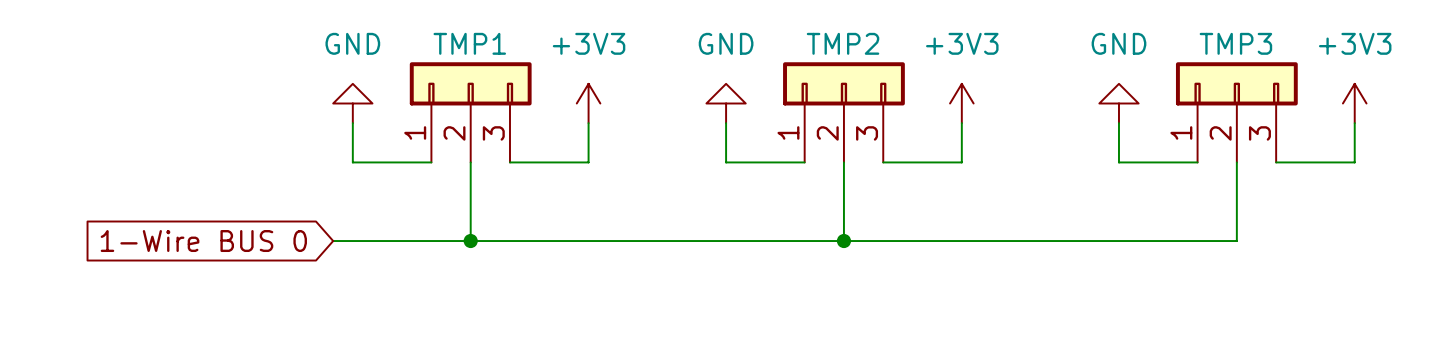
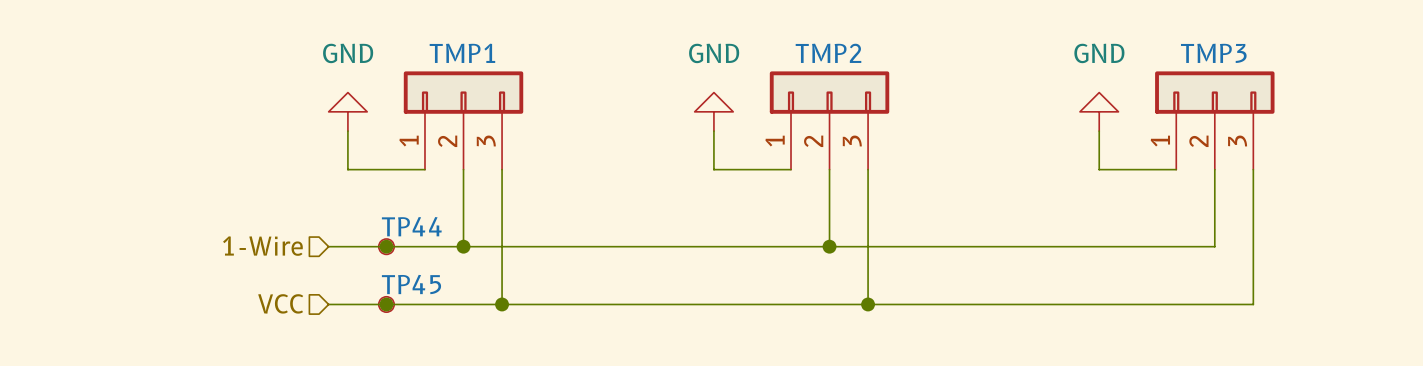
power symbol: +3V3 (588, 103) -> none
power symbol: +3V3 (961, 103) -> none
power symbol: +3V3 (1354, 103) -> none
wire: (588, 123) (588, 162) (509, 162) -> (502, 304) (502, 169)
wire: (961, 123) (961, 162) (883, 162) -> (868, 304) (868, 169)
wire: (1354, 123) (1354, 162) (1276, 162) -> (328, 304) (1253, 304) (1253, 169)
hierarchical label: none -> 1-Wire (262, 246)
global label: 1-Wire BUS 0 (203, 241) -> none
junction: none -> (386, 246)
TP44: none -> (386, 246)
hierarchical label: none -> VCC (280, 303)
junction: none -> (386, 304)
TP45: none -> (386, 304)
junction: none -> (502, 304)
junction: none -> (868, 304)

